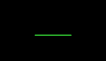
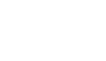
wire: (35, 35) (71, 35) -> none

